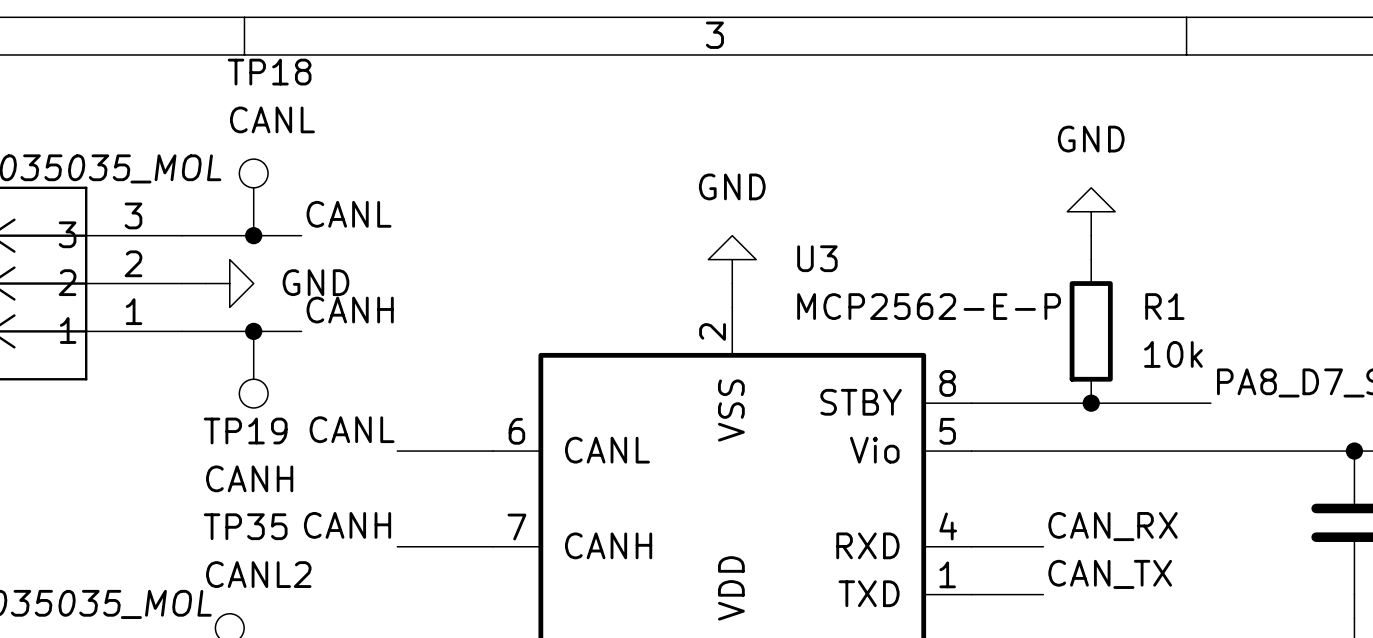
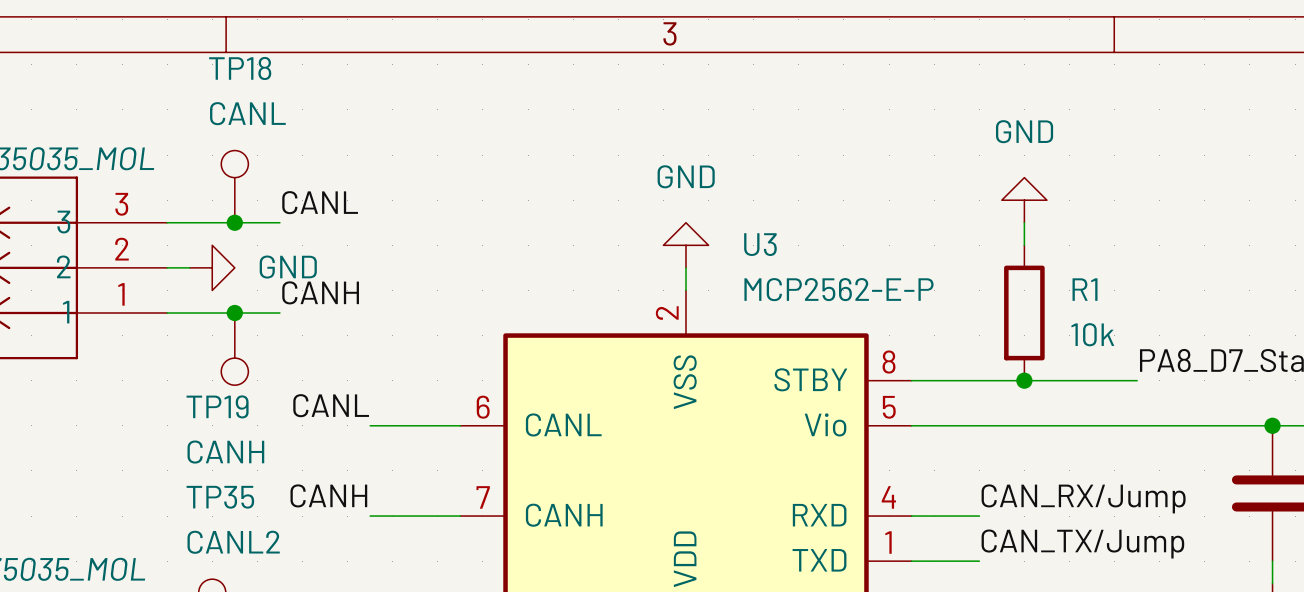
label: CAN_RX (1113, 526) -> CAN_RX/Jump (1083, 498)
label: CAN_TX (1110, 574) -> CAN_TX/Jump (1082, 544)

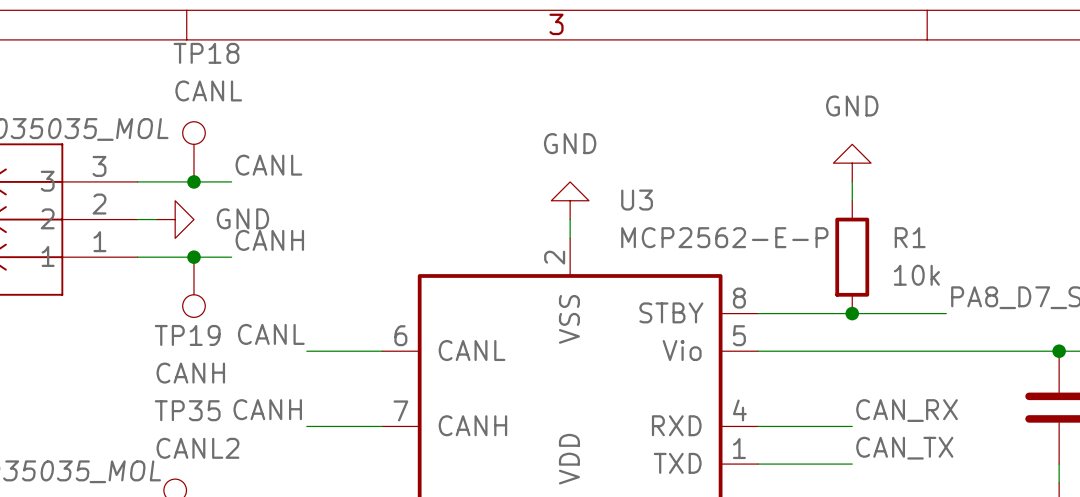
label: CAN_RX/Jump (1083, 498) -> CAN_RX (907, 410)
wire: none -> (814, 426) (852, 426)
label: CAN_TX/Jump (1082, 544) -> CAN_TX (904, 448)
wire: none -> (814, 464) (852, 464)

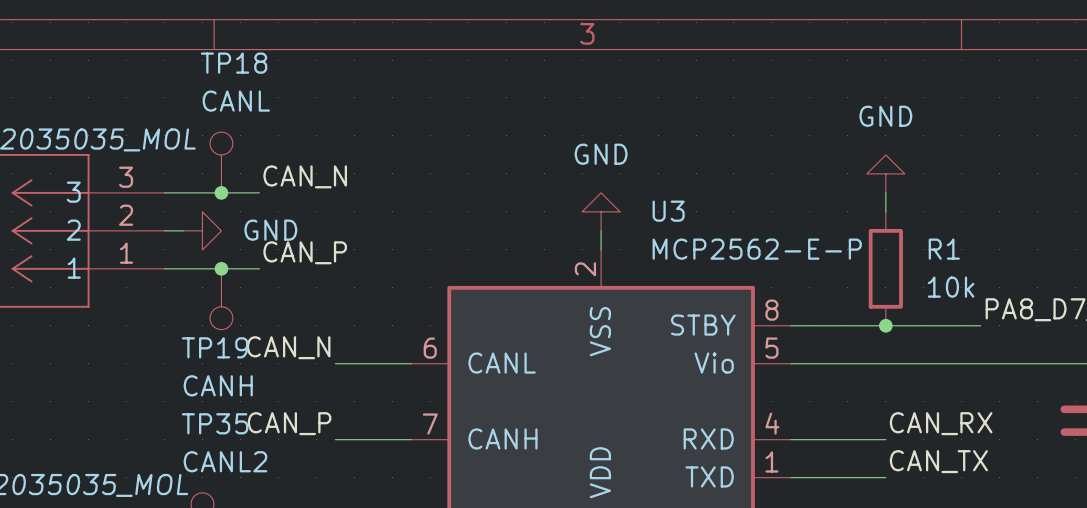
label: CANL (268, 165) -> CAN_N (305, 176)
label: CANH (269, 240) -> CAN_P (305, 252)
label: CANL (271, 334) -> CAN_N (288, 347)
label: CANH (267, 409) -> CAN_P (289, 423)

